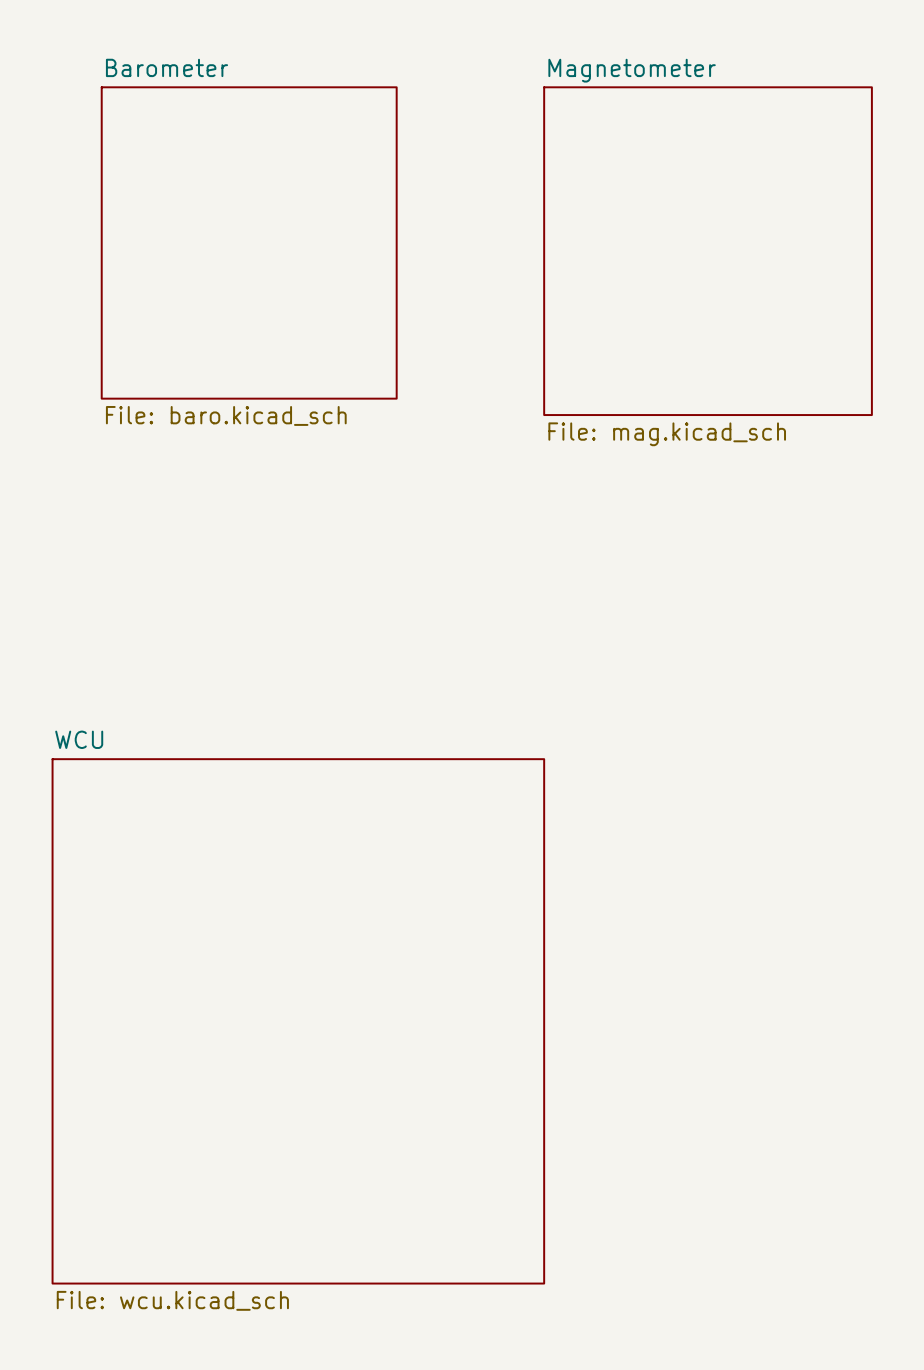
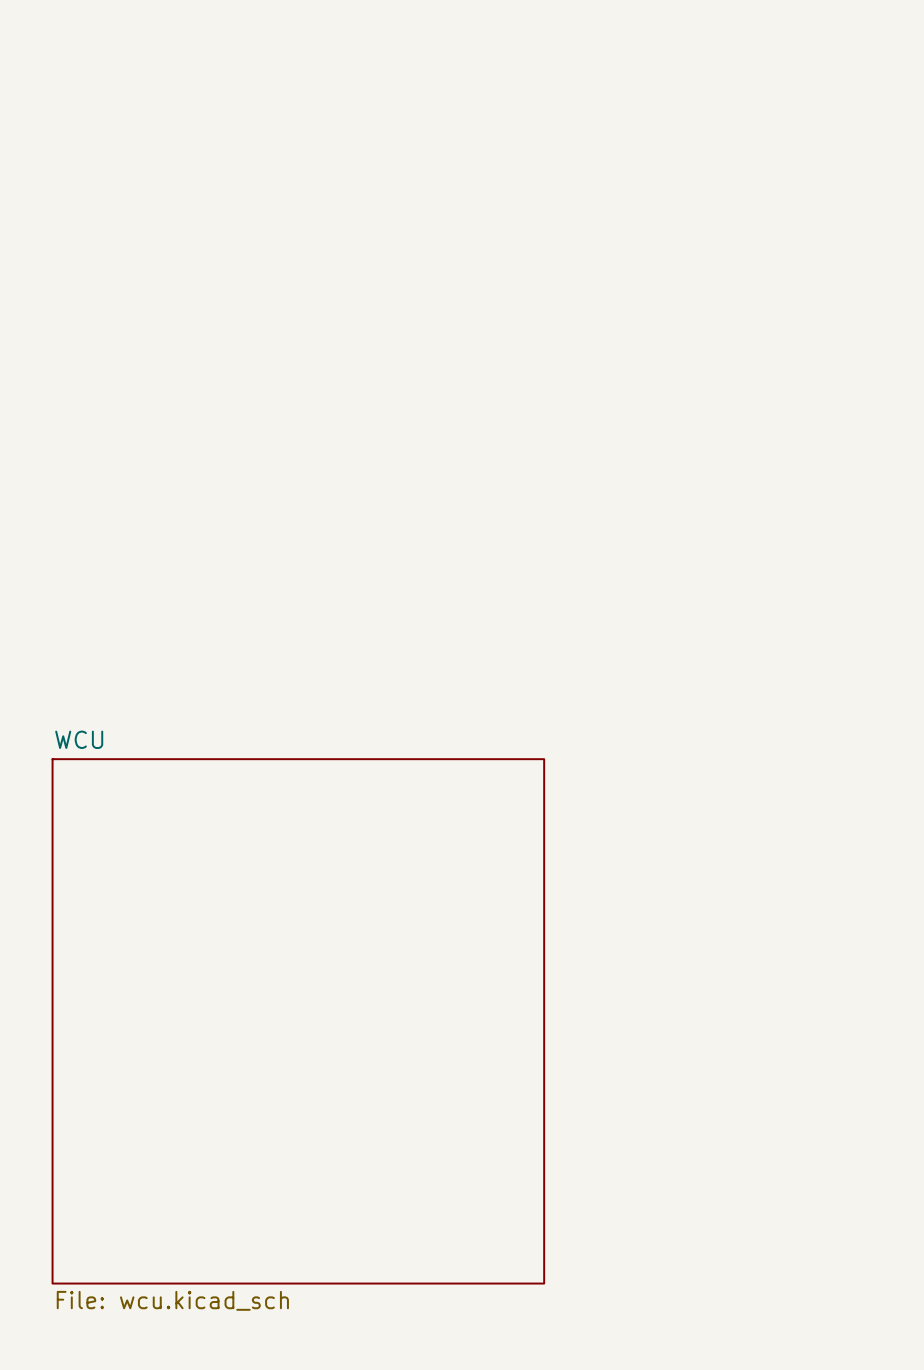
sheet Barometer: File: baro.kicad_sch (249, 242) -> none
sheet Magnetometer: File: mag.kicad_sch (708, 251) -> none

